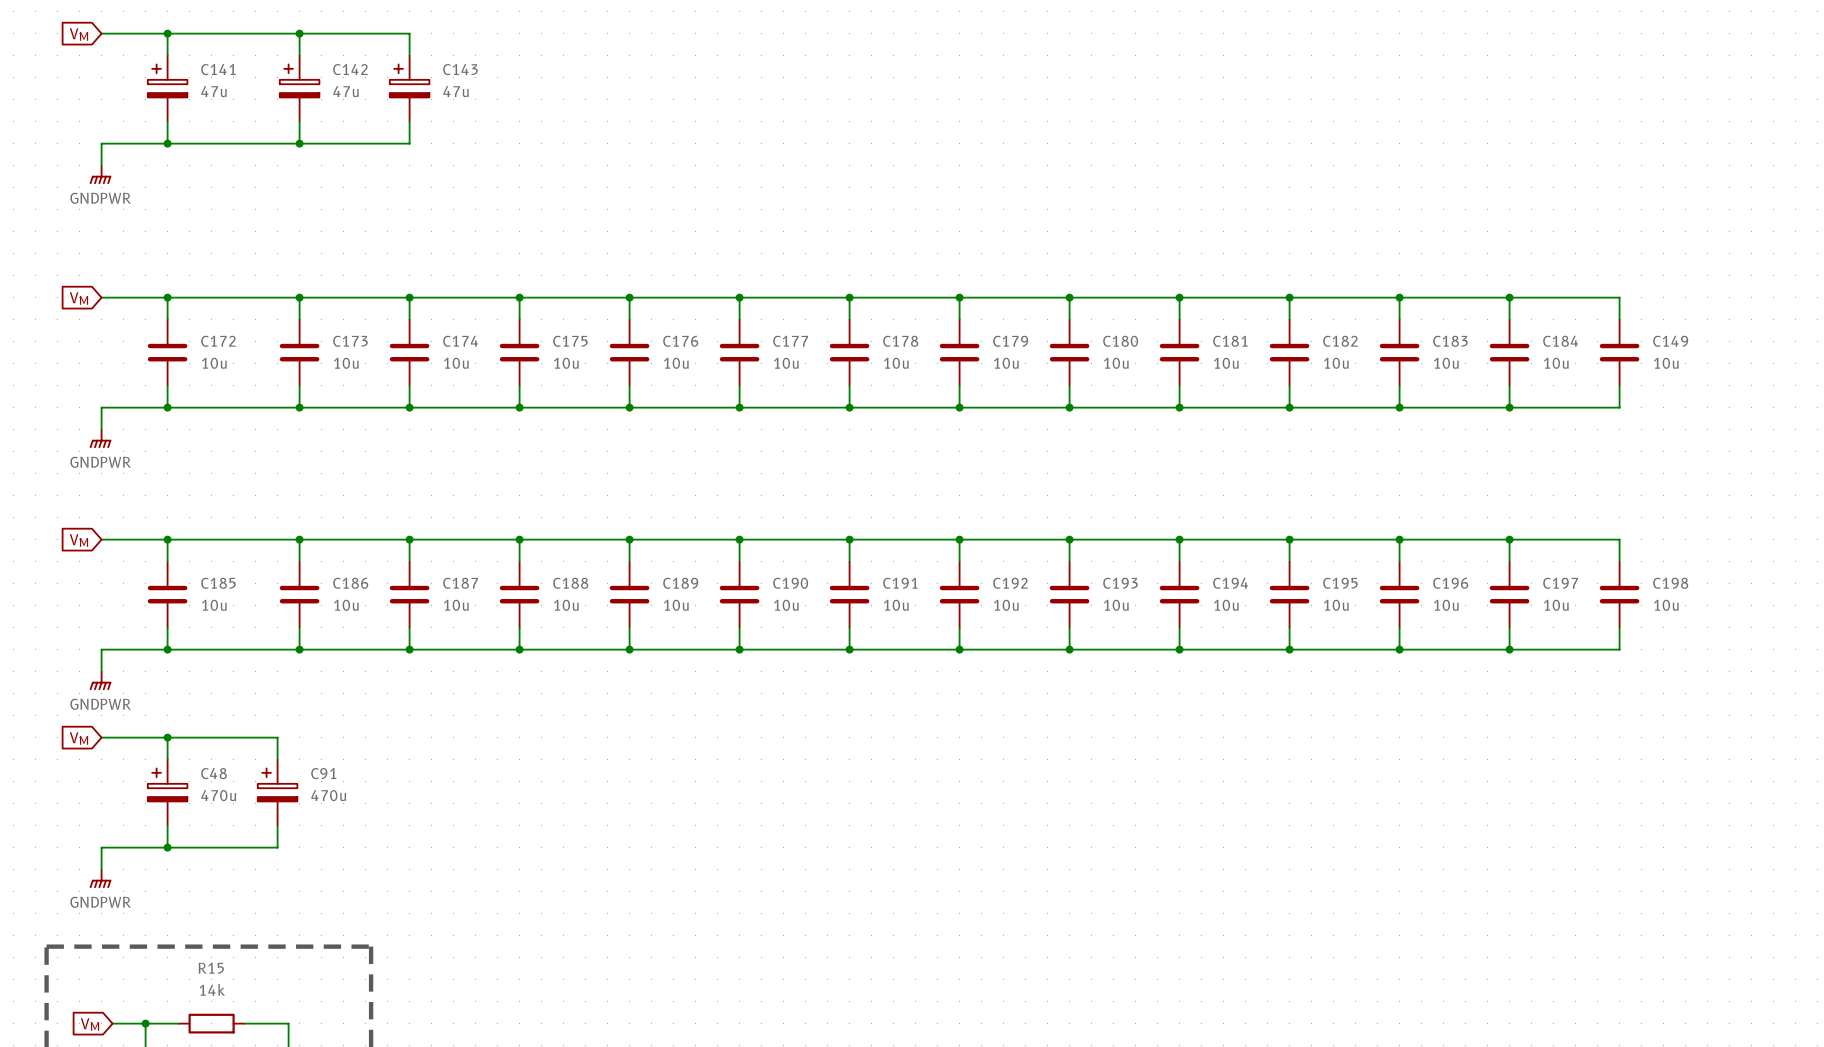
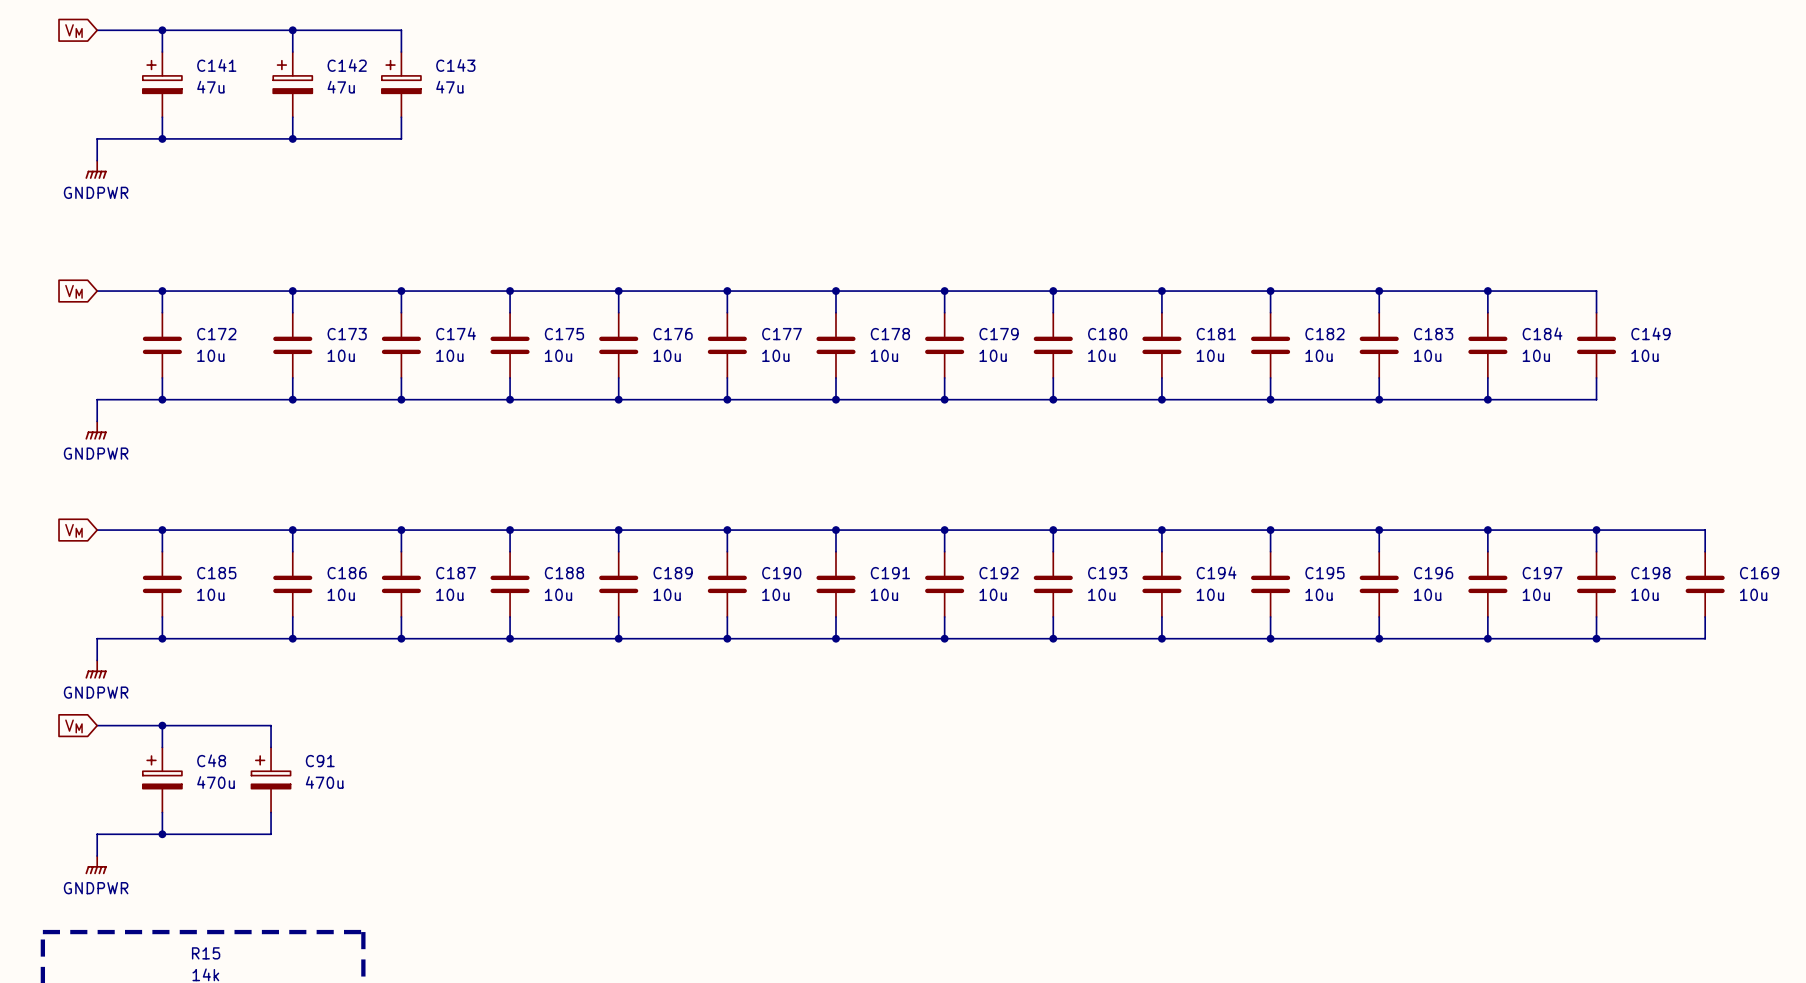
wire: none -> (1596, 530) (1705, 530) (1705, 551)
junction: none -> (1596, 530)
C169: none -> 10u (1705, 584)
wire: none -> (1705, 616) (1705, 638) (1596, 638)
junction: none -> (1596, 638)

